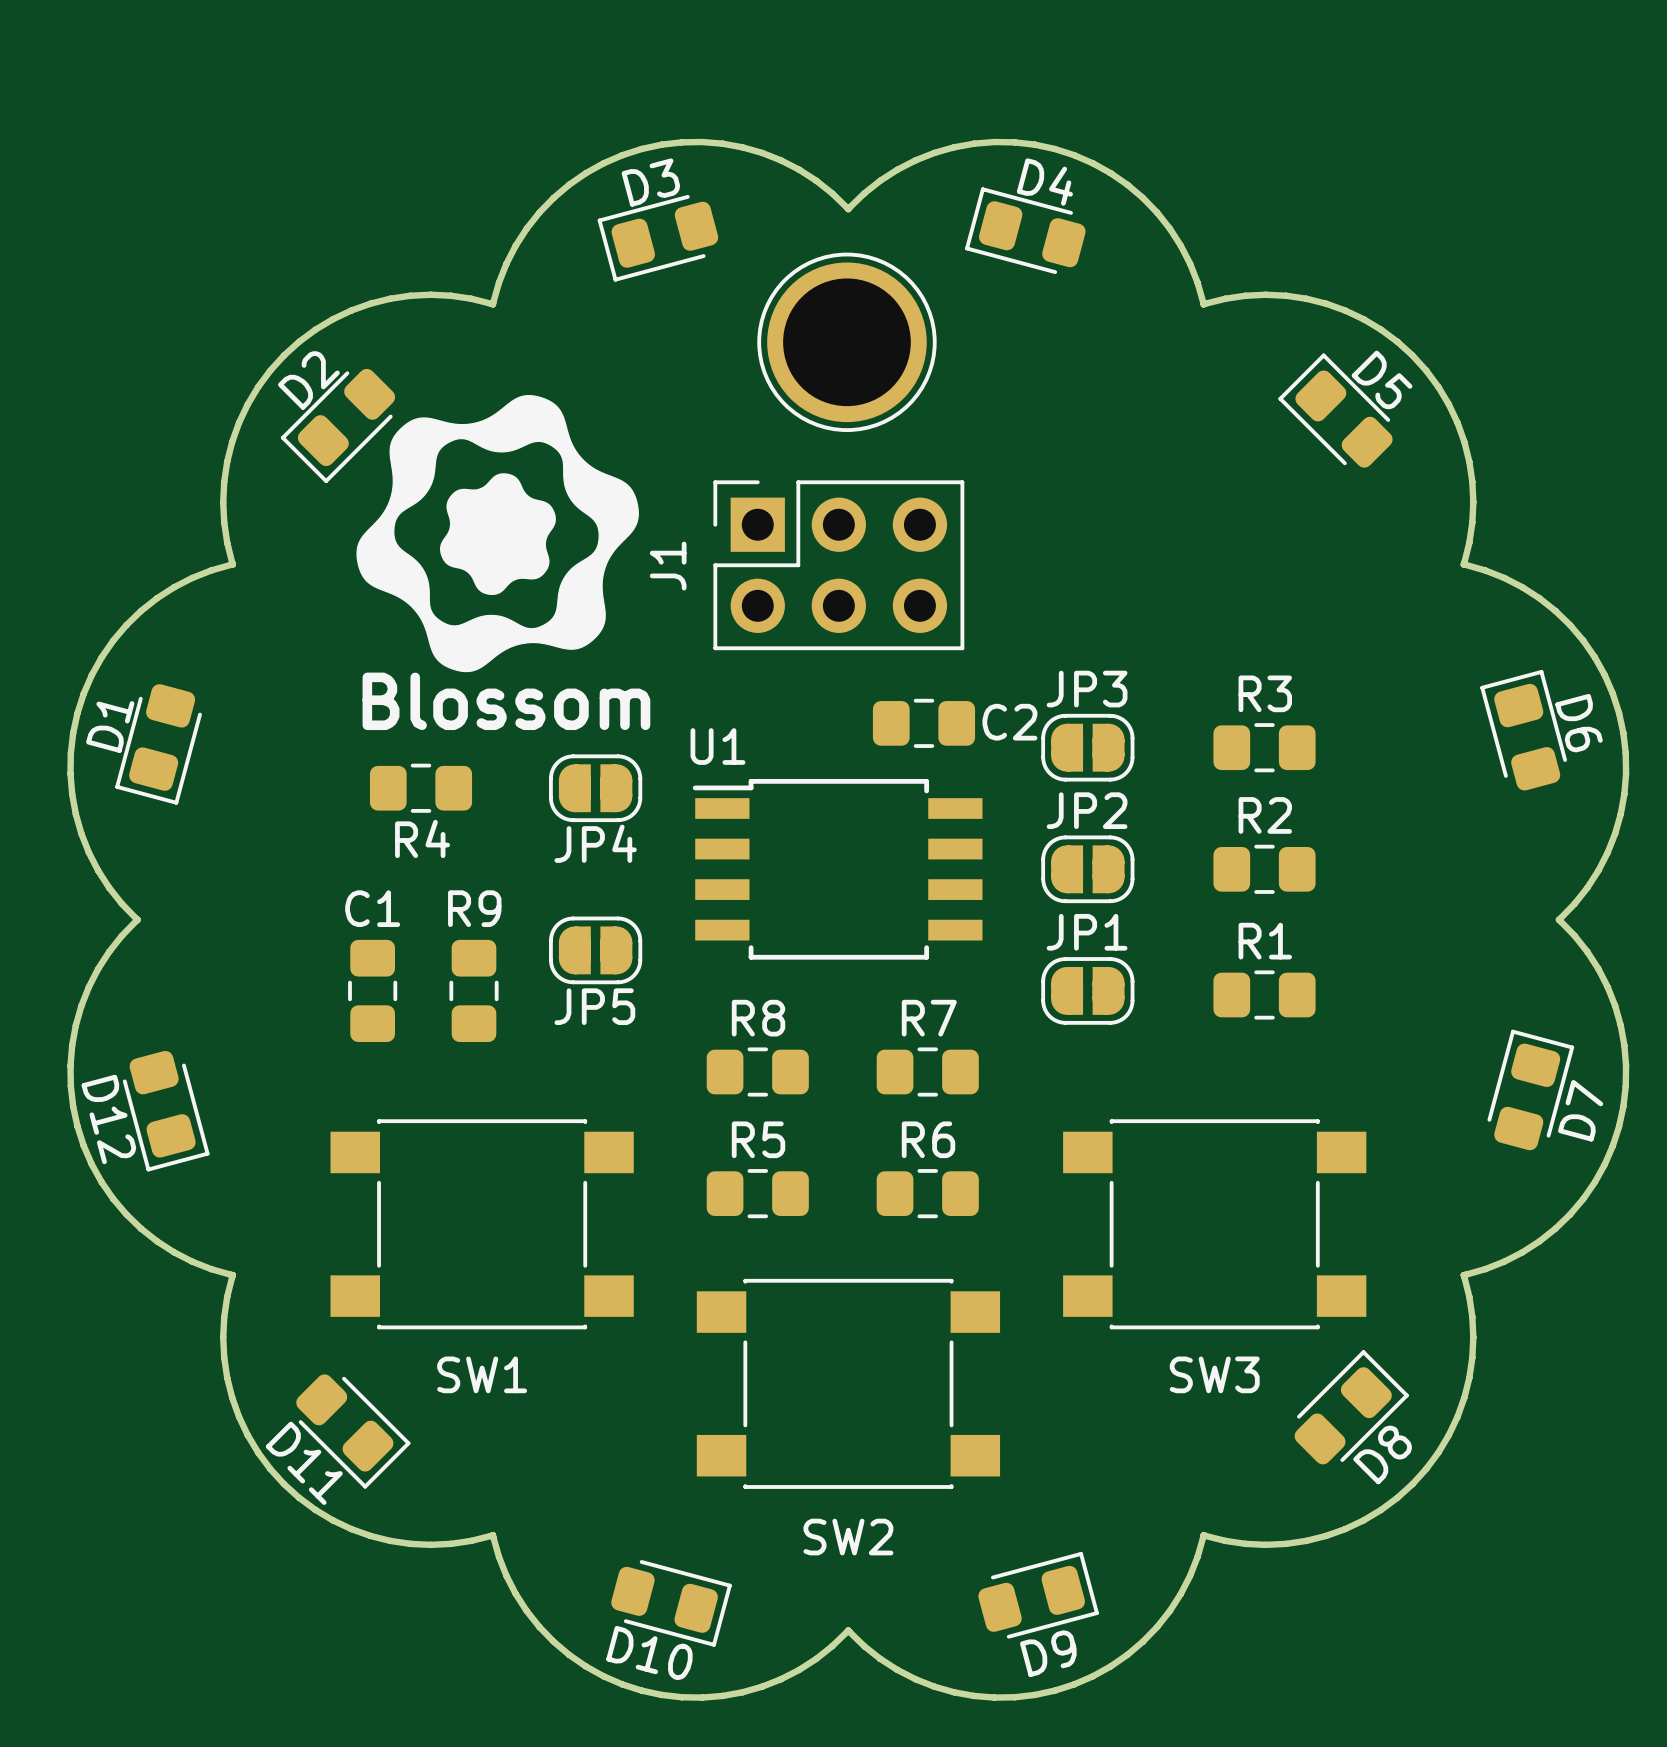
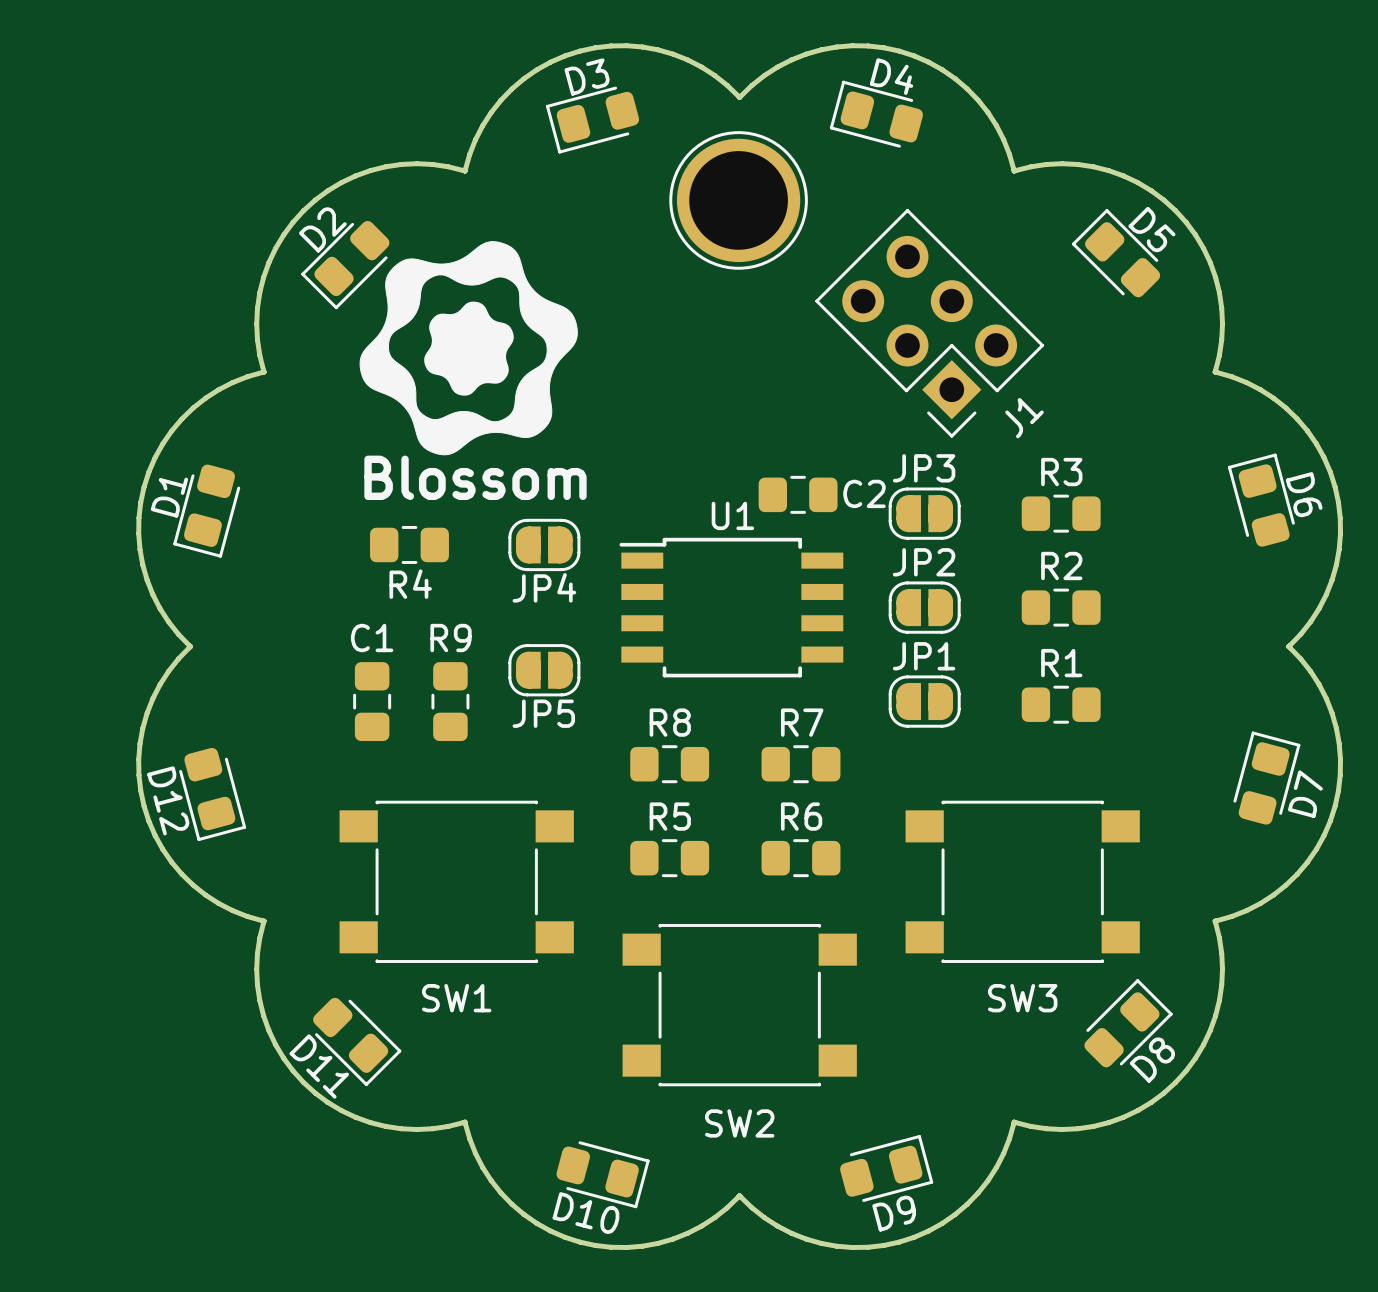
J1 rotation: 0° (838, 565) -> 135° counterclockwise (929, 323)
J1 position: (838, 565) -> (929, 323)
U1 name position: U1 (717, 746) -> U1 (732, 515)

